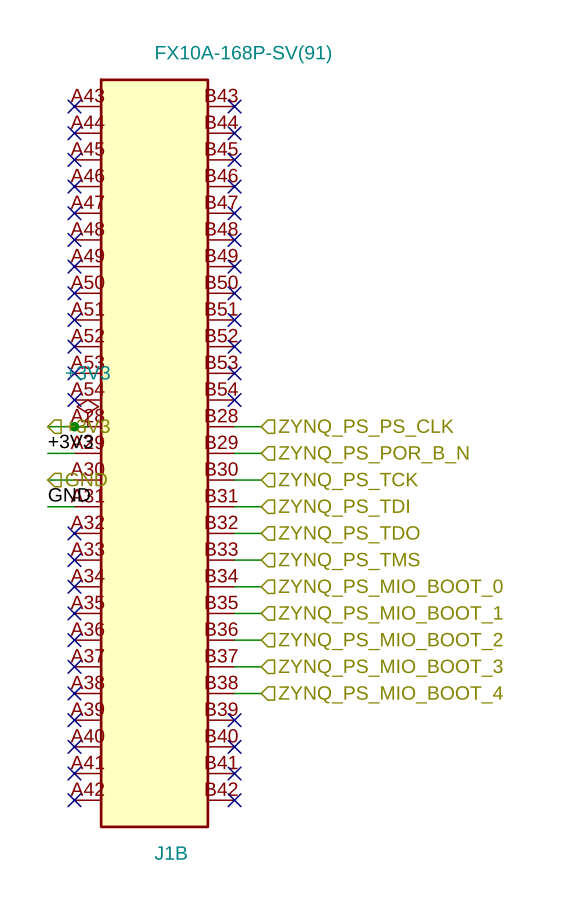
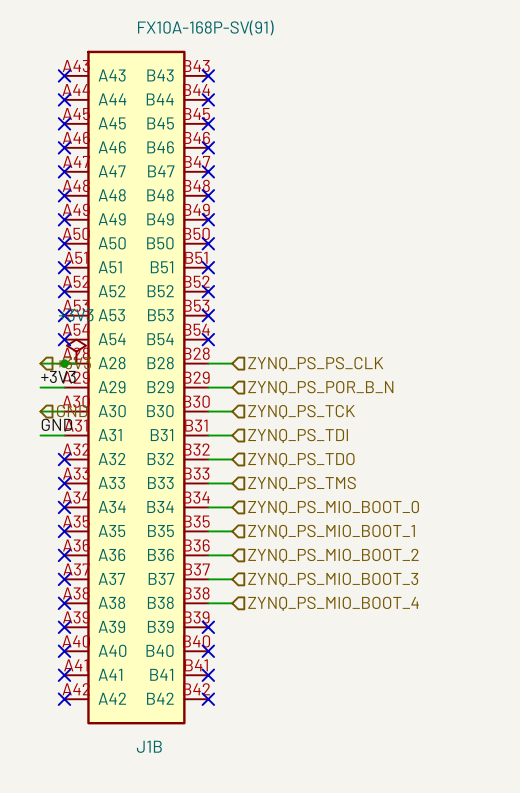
J1B symbol: [74, 78, 235, 829] -> [64, 50, 209, 725]

